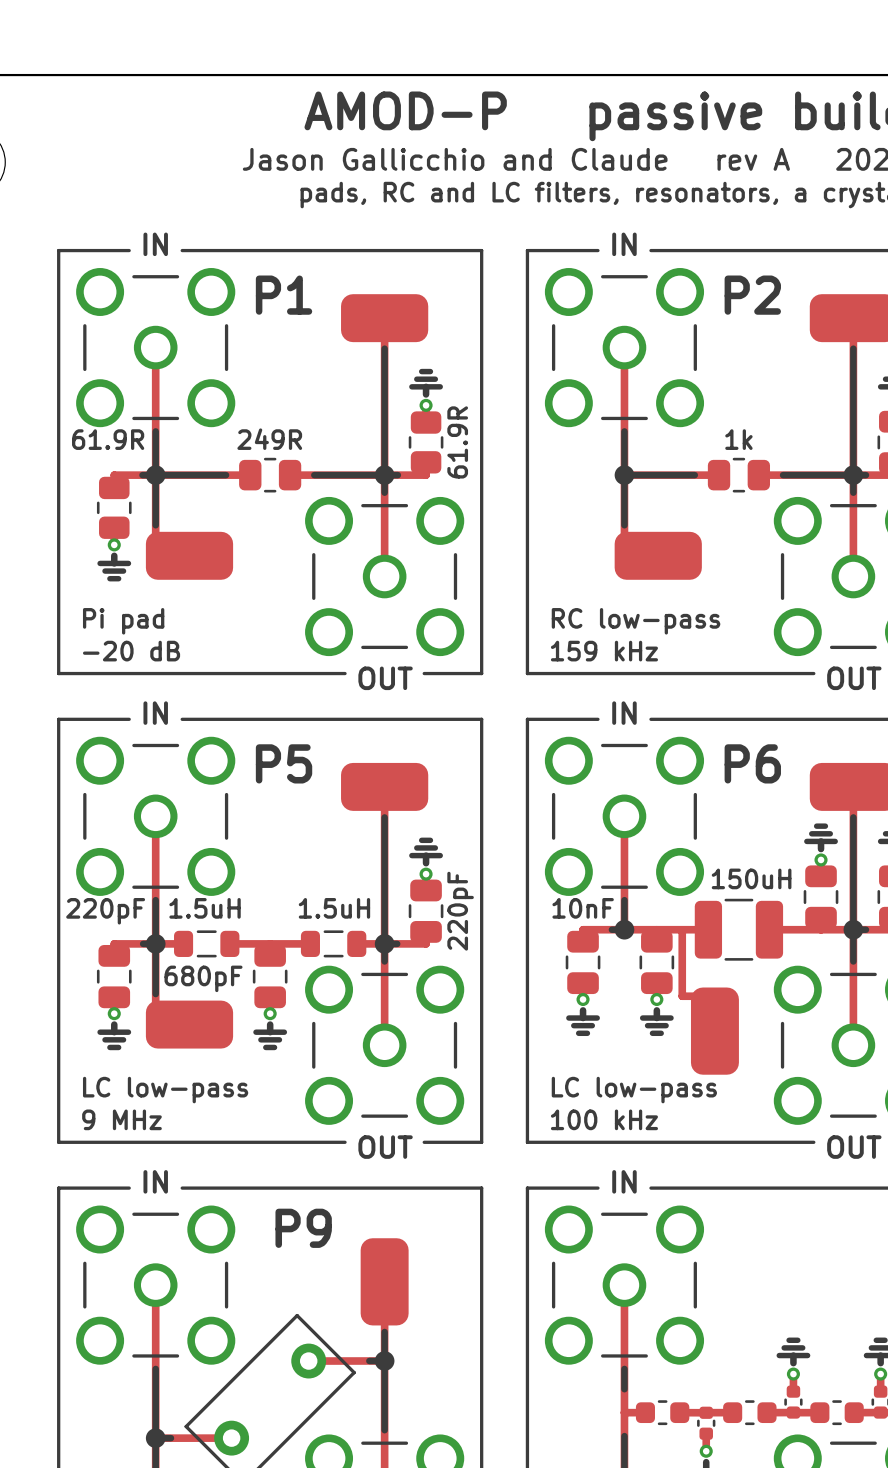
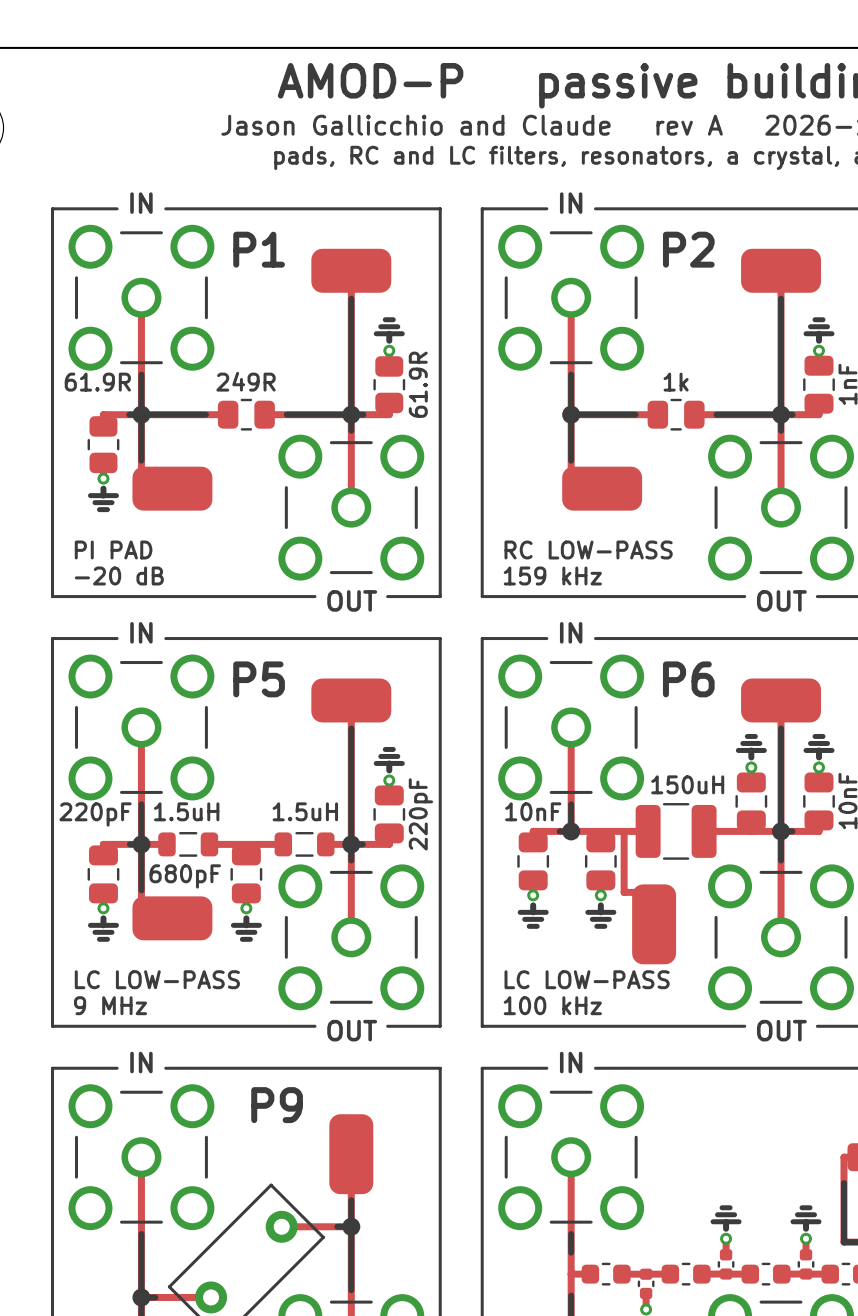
text: Pi pad (123, 621) -> PI PAD (113, 549)
text: RC low-pass (636, 621) -> RC LOW-PASS (588, 549)
text: LC low-pass (165, 1090) -> LC LOW-PASS (157, 979)
text: LC low-pass (634, 1090) -> LC LOW-PASS (587, 979)

